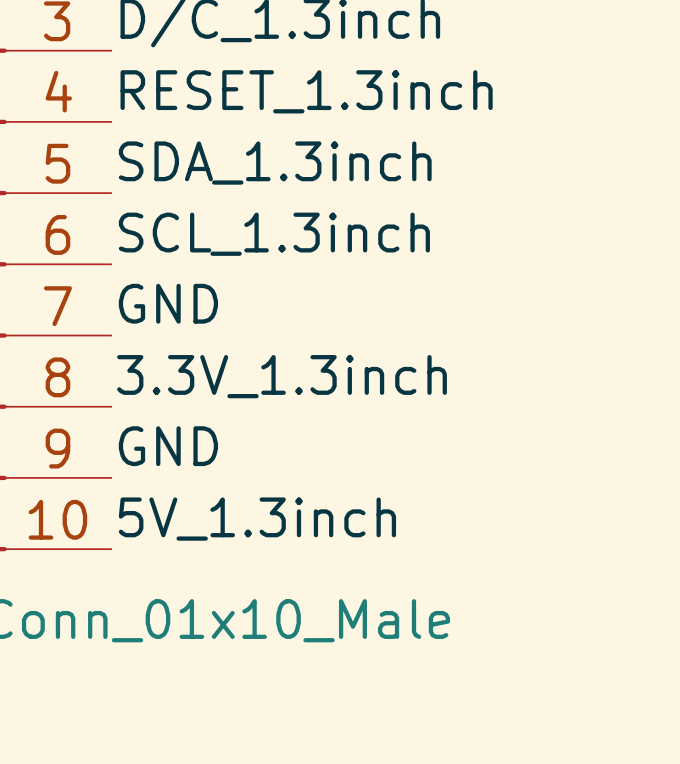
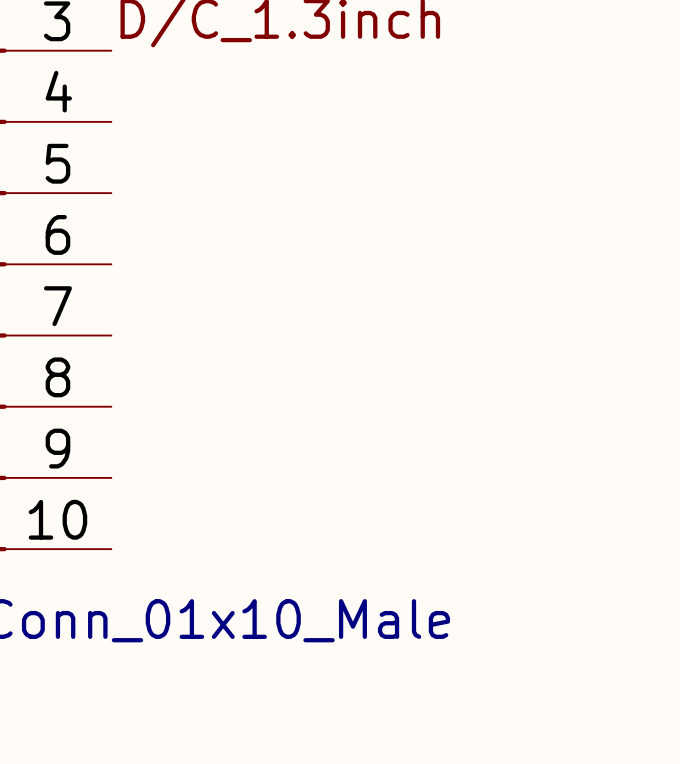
label: RESET_1.3inch (306, 91) -> none
label: SDA_1.3inch (275, 163) -> none
label: SCL_1.3inch (274, 234) -> none
label: GND (168, 303) -> none
label: 3.3V_1.3inch (282, 376) -> none
label: GND (168, 446) -> none
label: 5V_1.3inch (257, 519) -> none

